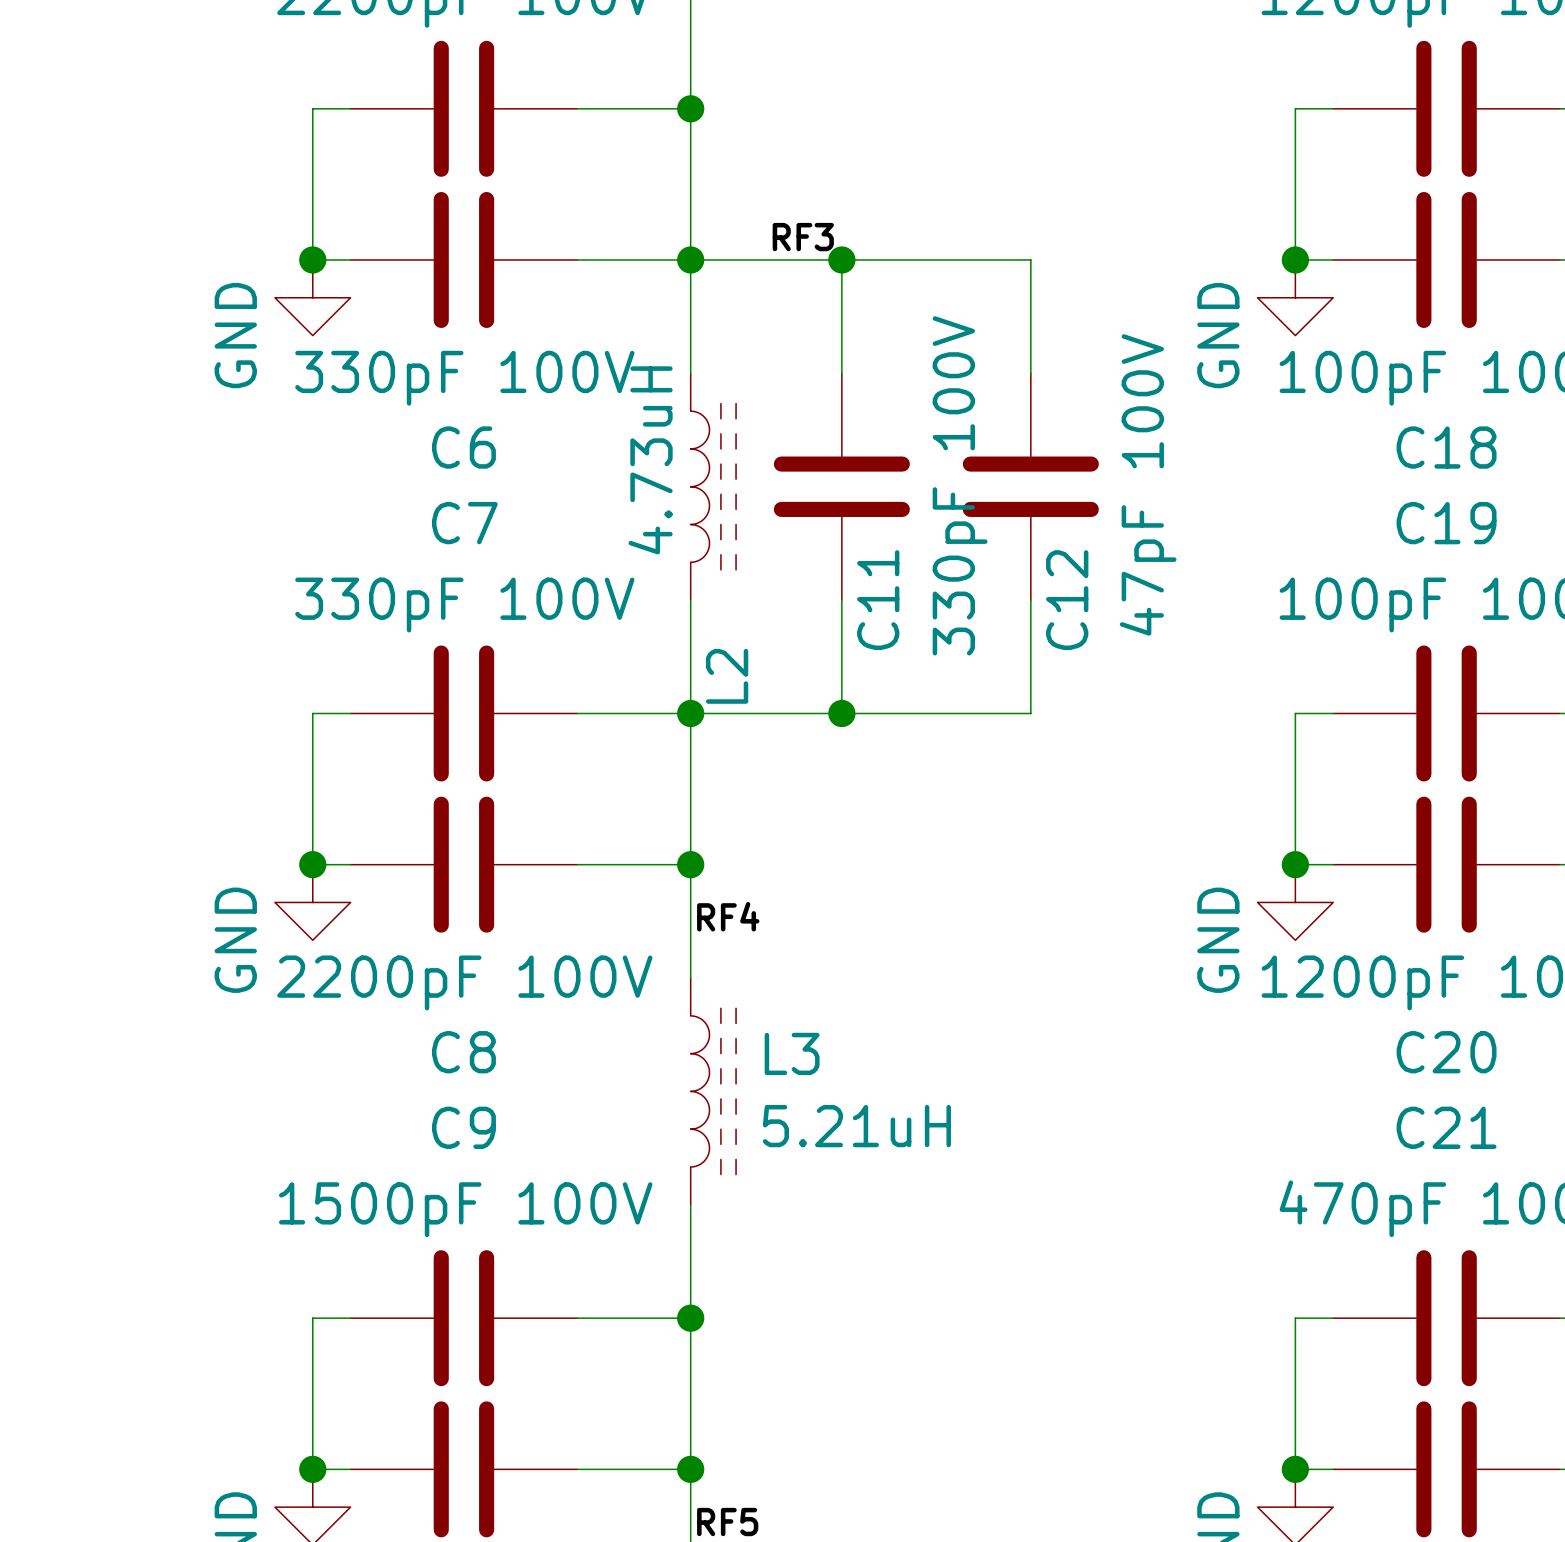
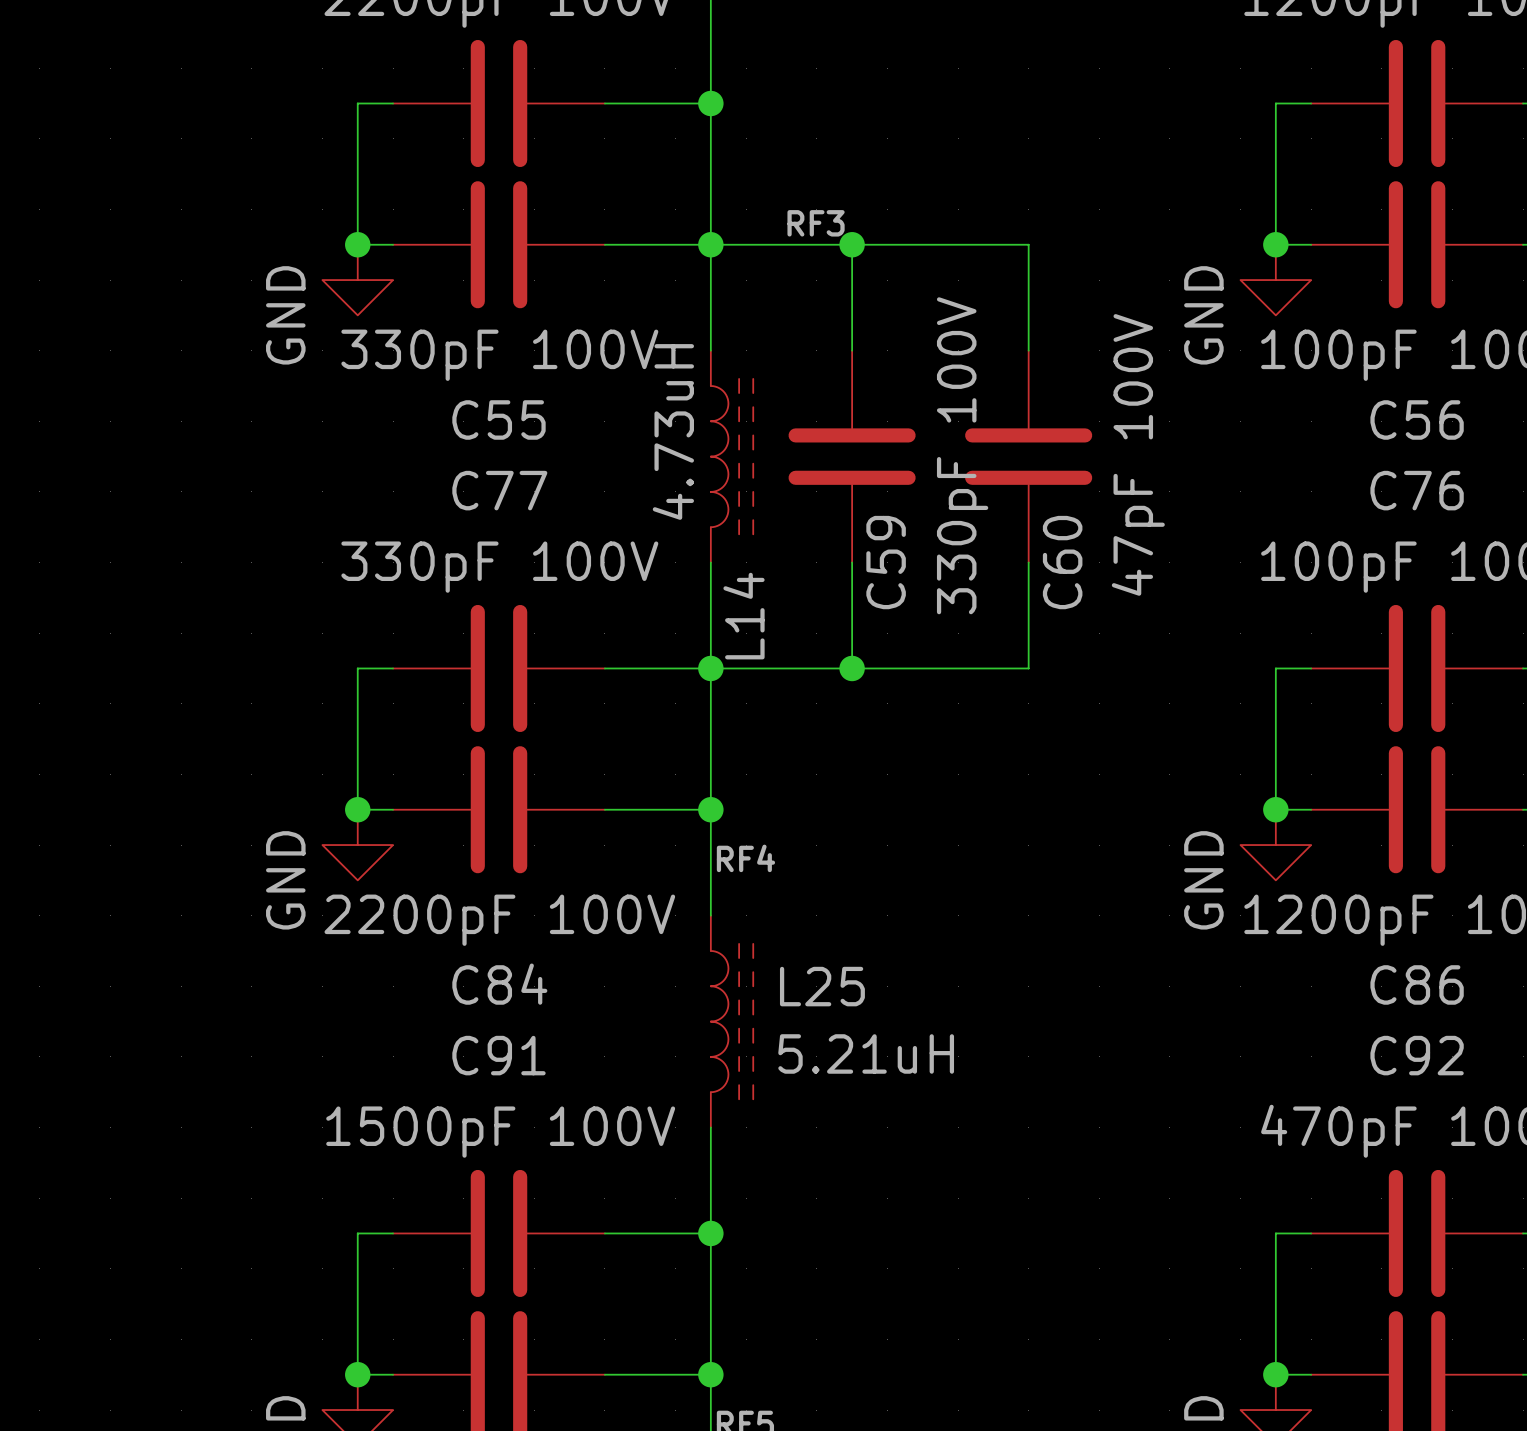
C6 name: C6 (463, 447) -> C55 (498, 419)
C18 name: C18 (1446, 447) -> C56 (1417, 419)
C7 name: C7 (464, 523) -> C77 (499, 490)
C19 name: C19 (1446, 523) -> C76 (1417, 490)
C11 name: C11 (878, 600) -> C59 (886, 562)
C12 name: C12 (1067, 600) -> C60 (1062, 562)
L2 name: L2 (727, 676) -> L14 (744, 616)
C8 name: C8 (463, 1052) -> C84 (499, 984)
C20 name: C20 (1446, 1052) -> C86 (1417, 984)
L3 name: L3 (792, 1053) -> L25 (822, 986)
C9 name: C9 (463, 1127) -> C91 (498, 1055)
C21 name: C21 (1446, 1127) -> C92 (1417, 1055)

